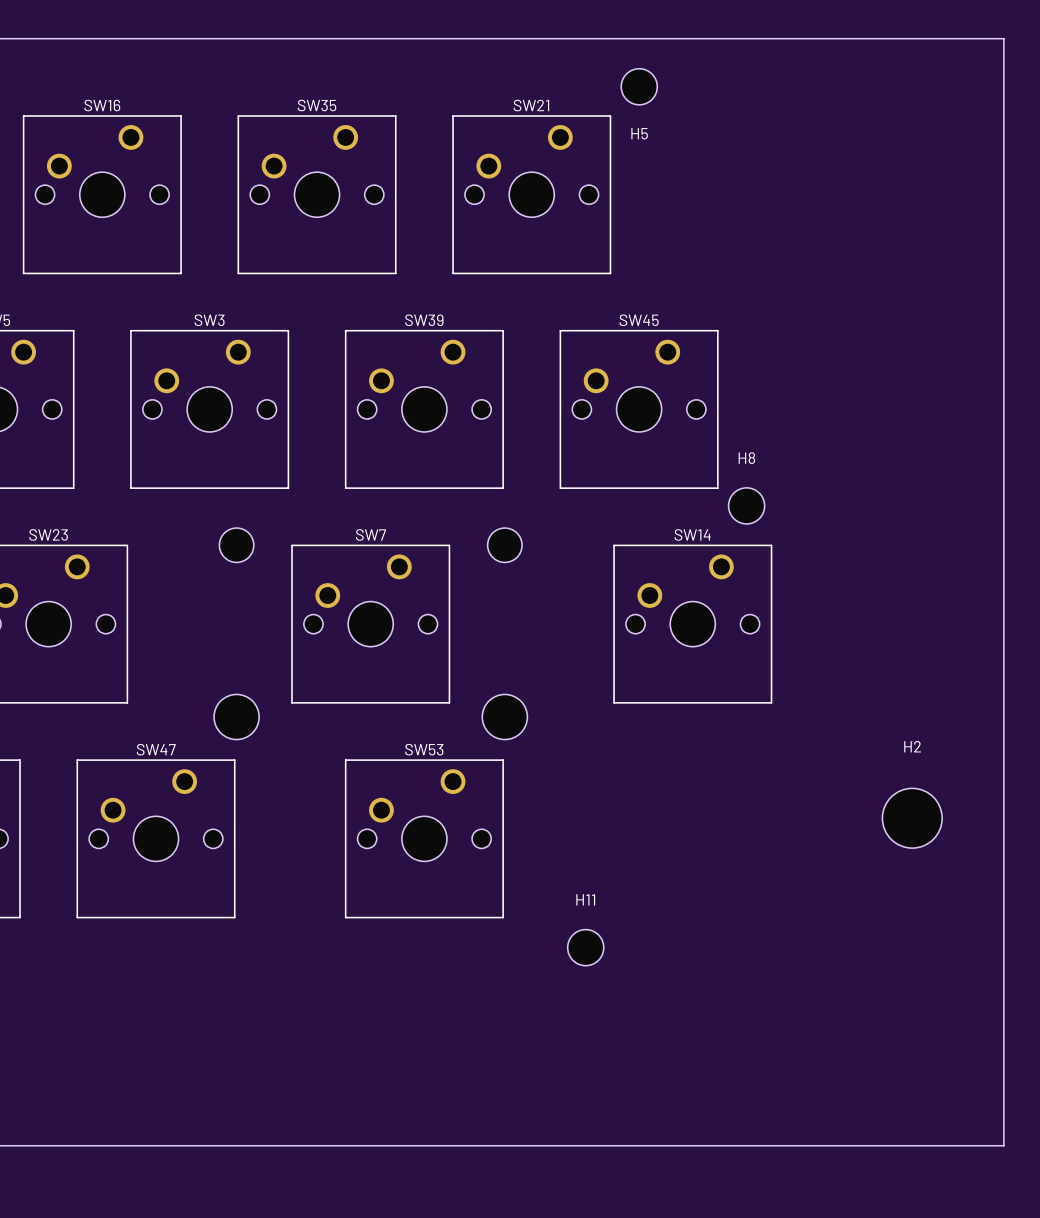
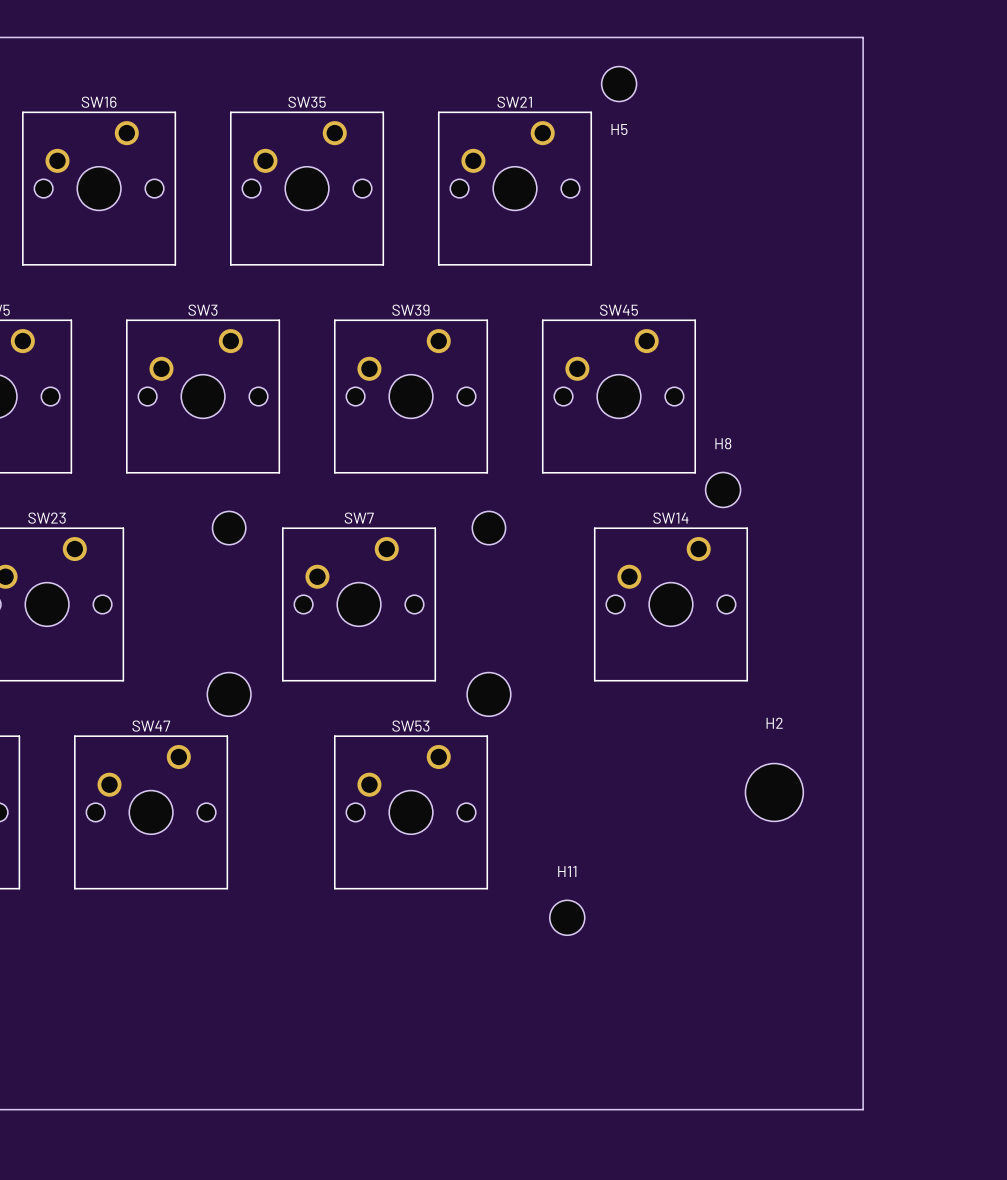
board edge: (891, 38) (1003, 38) (1003, 1145) (891, 1145) -> (863, 37) (863, 1109)
H2 position: (912, 818) -> (774, 792)

